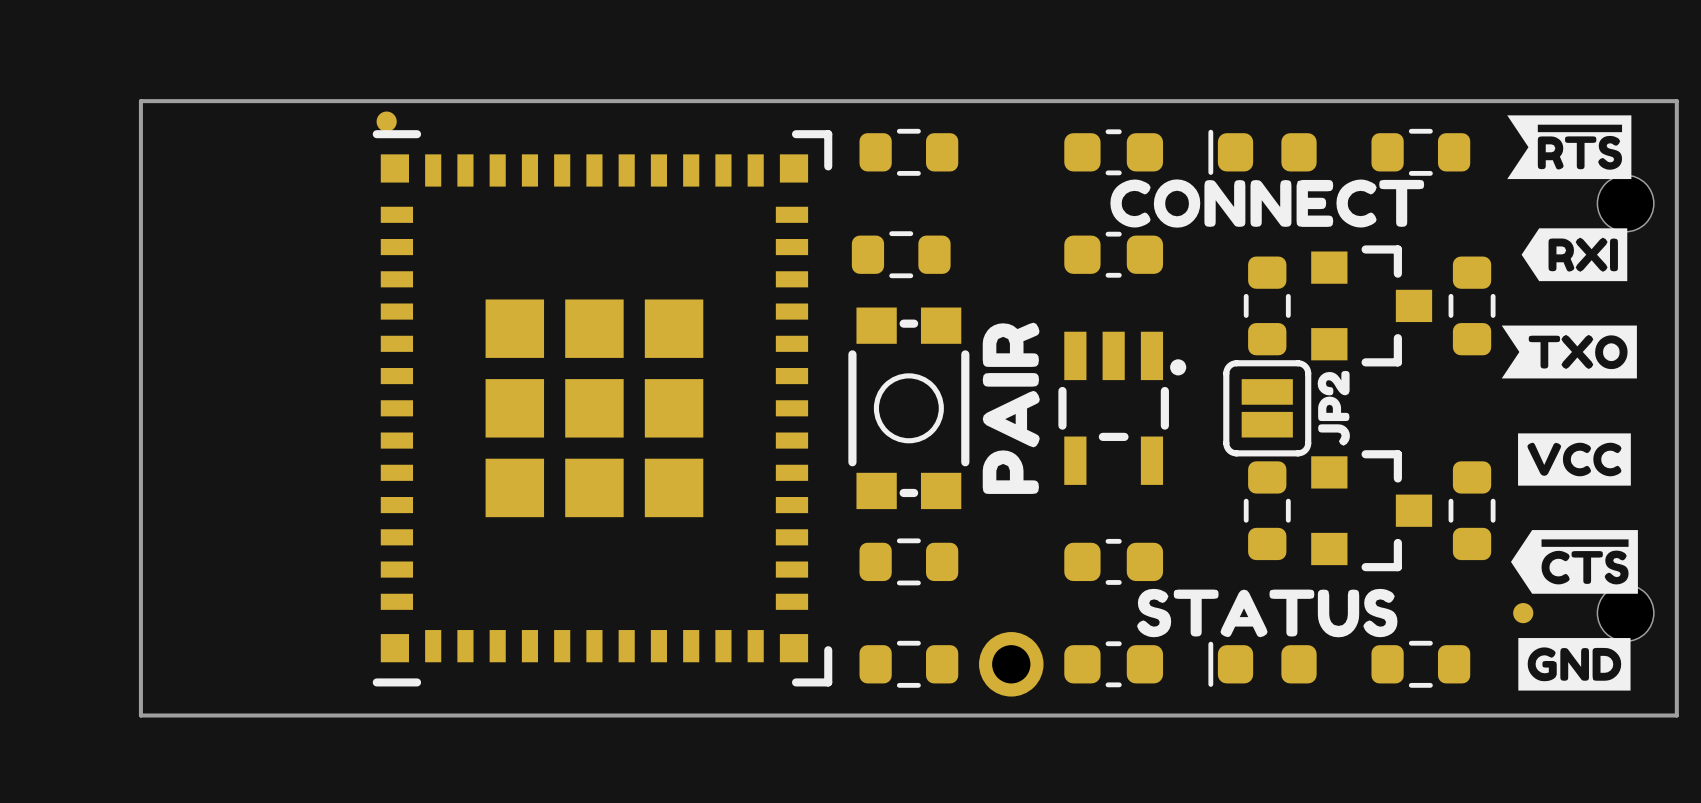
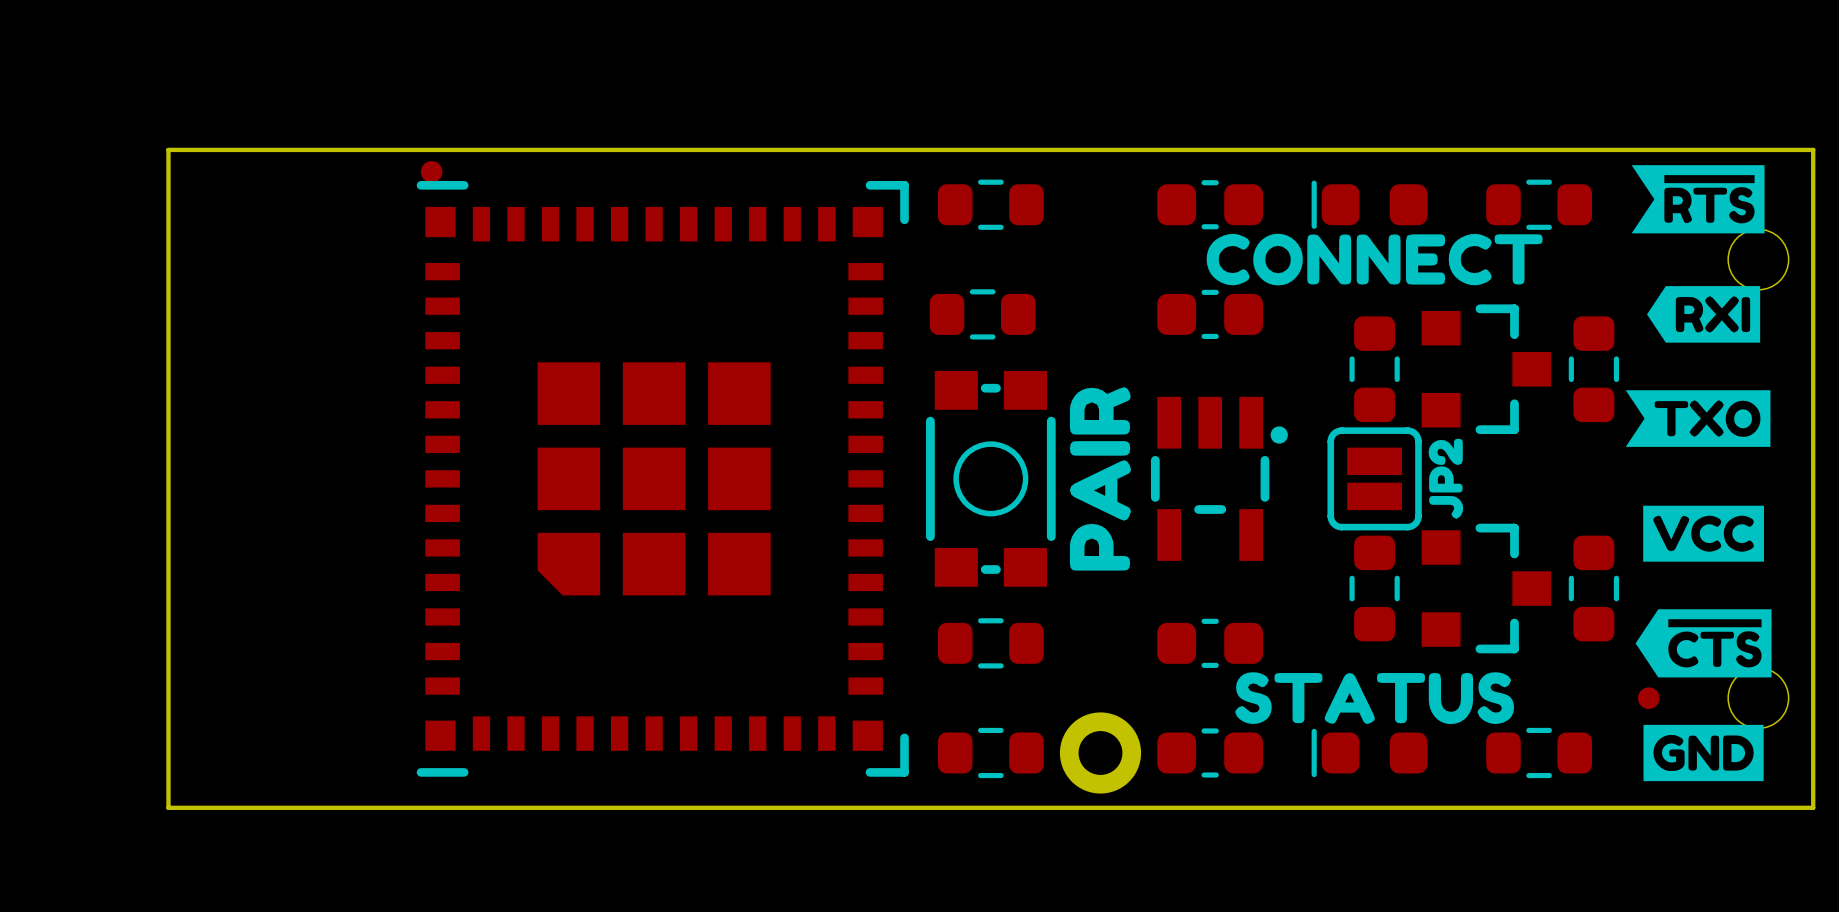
part footprint: [372, 130, 833, 687] -> [416, 181, 909, 777]
part footprint: [979, 632, 1044, 697] -> [1059, 712, 1142, 794]

